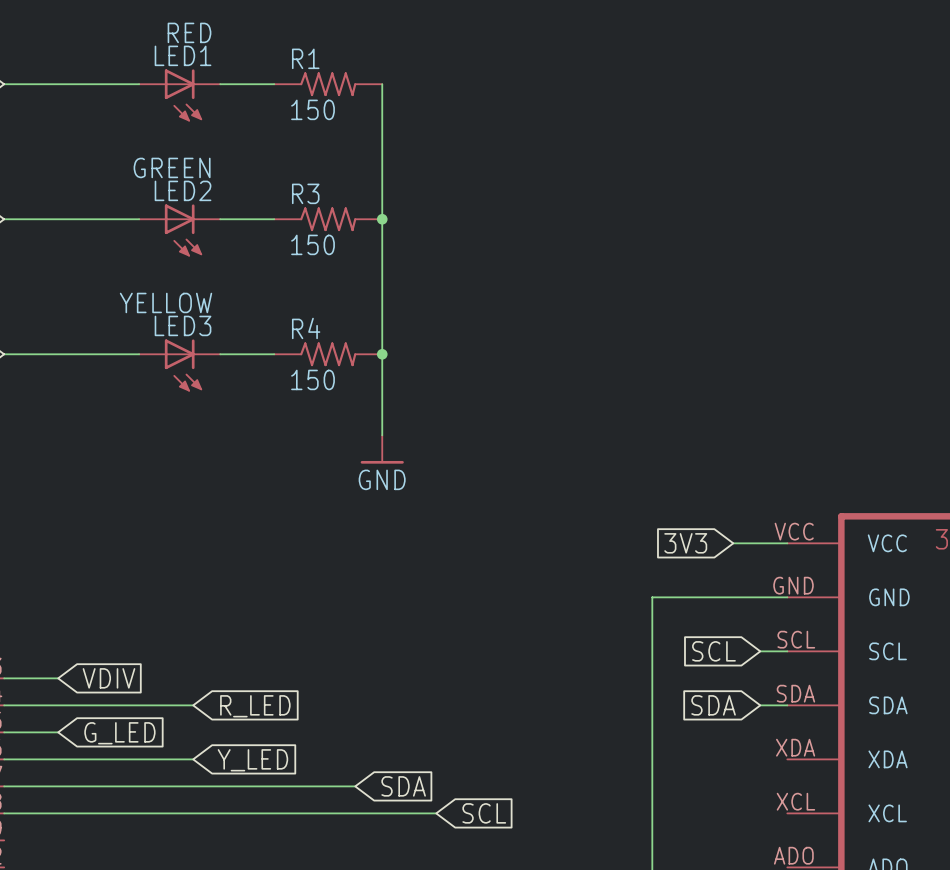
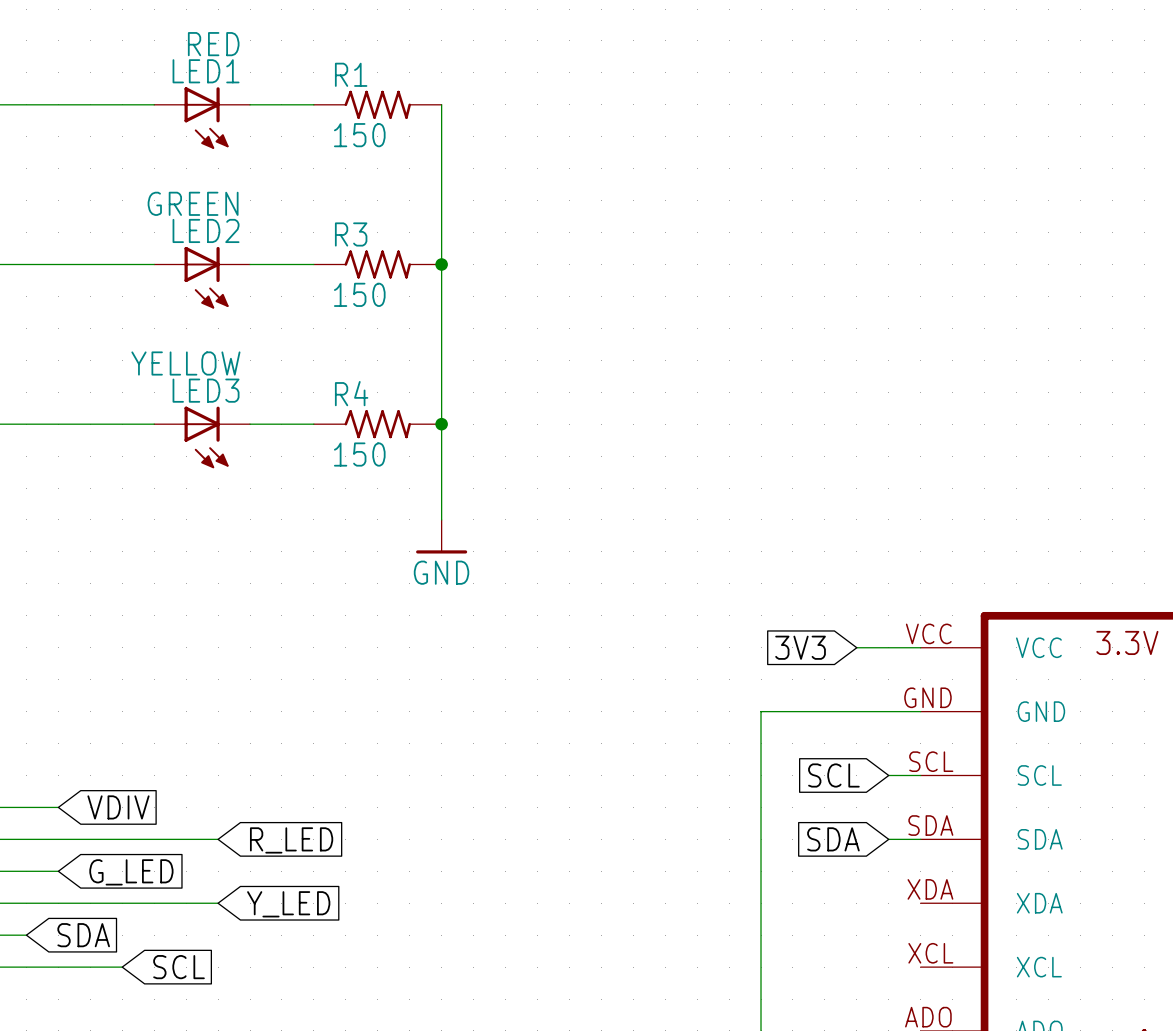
wire: (31, 786) (355, 786) -> none
global label: none -> SDA (83, 935)
global label: SDA (403, 786) -> none
wire: (112, 813) (436, 813) -> none
global label: none -> SCL (179, 967)
global label: SCL (484, 813) -> none

